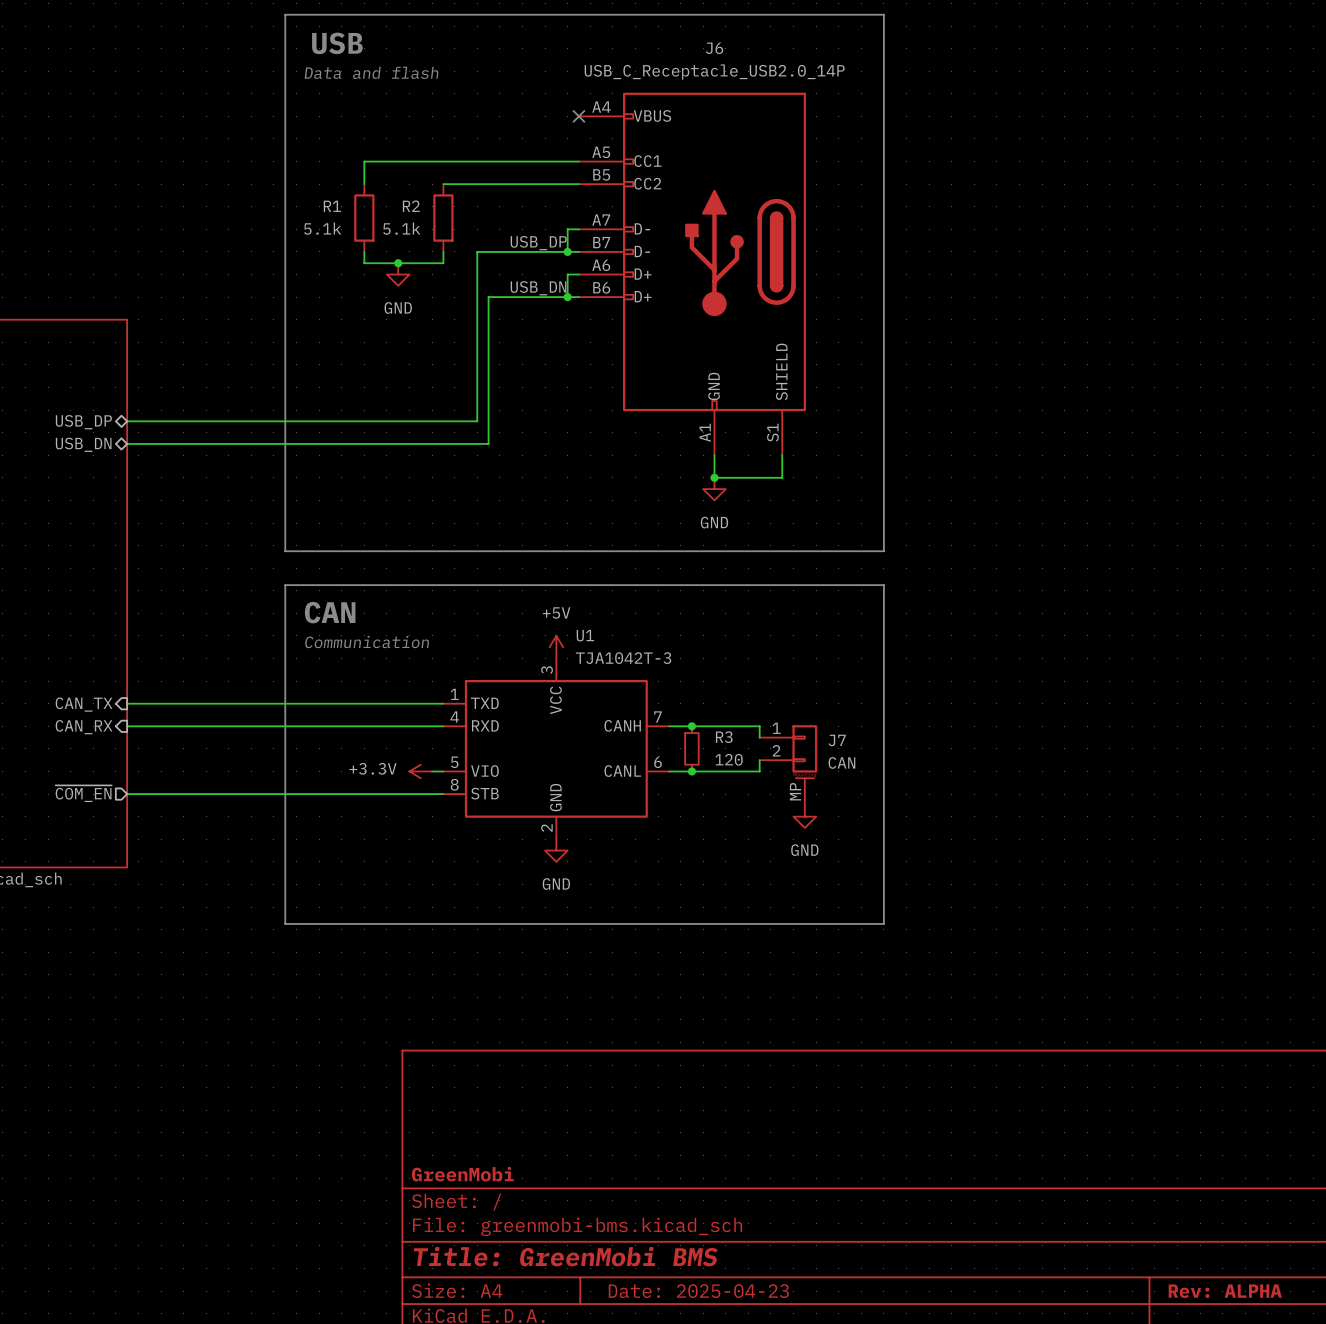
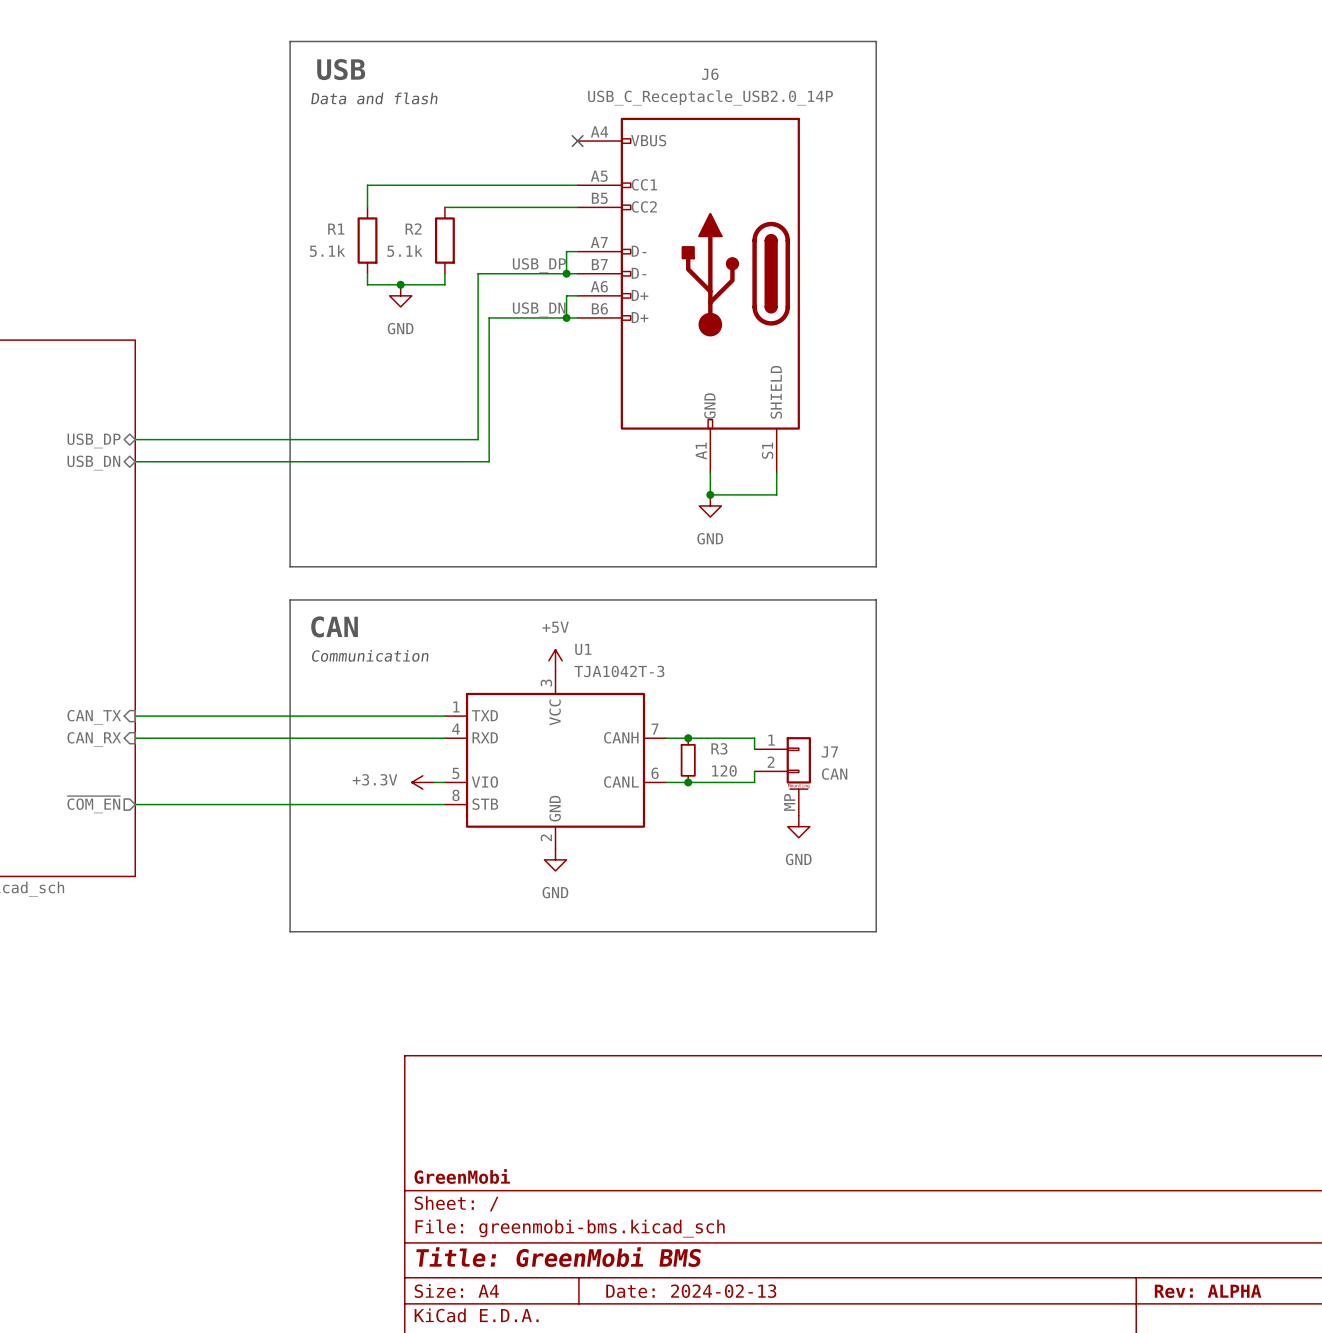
title block: Date: 2025-04-23 (698, 1291) -> Date: 2024-02-13 (691, 1291)

